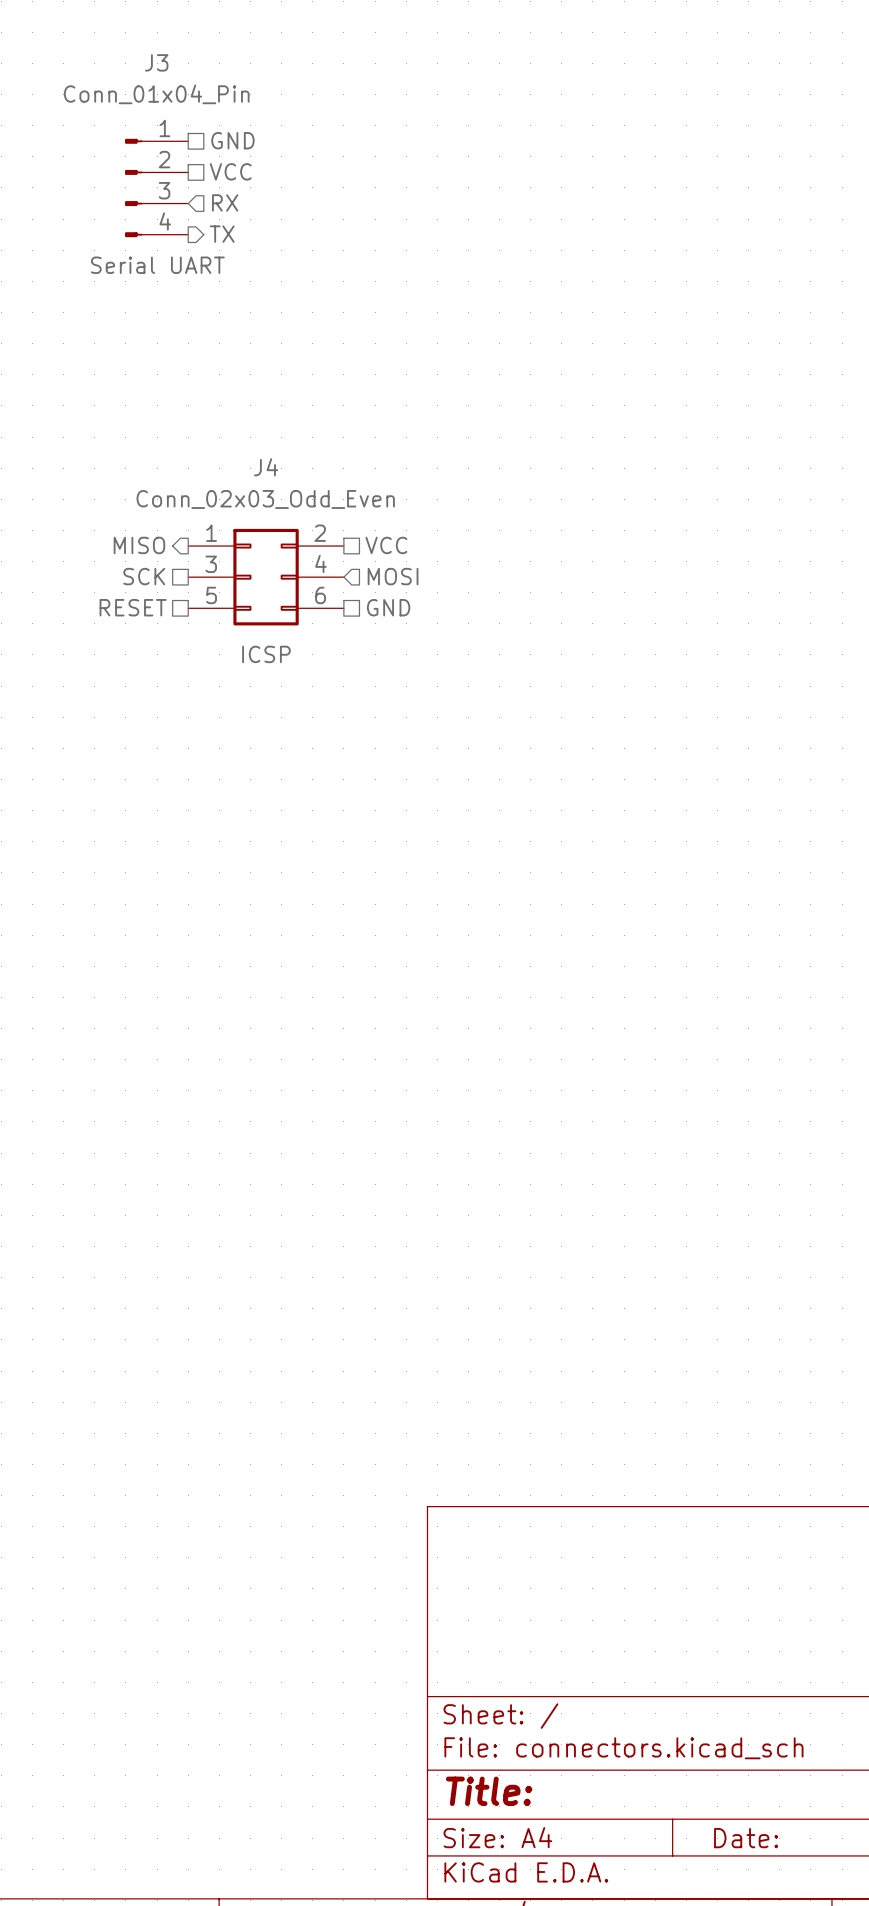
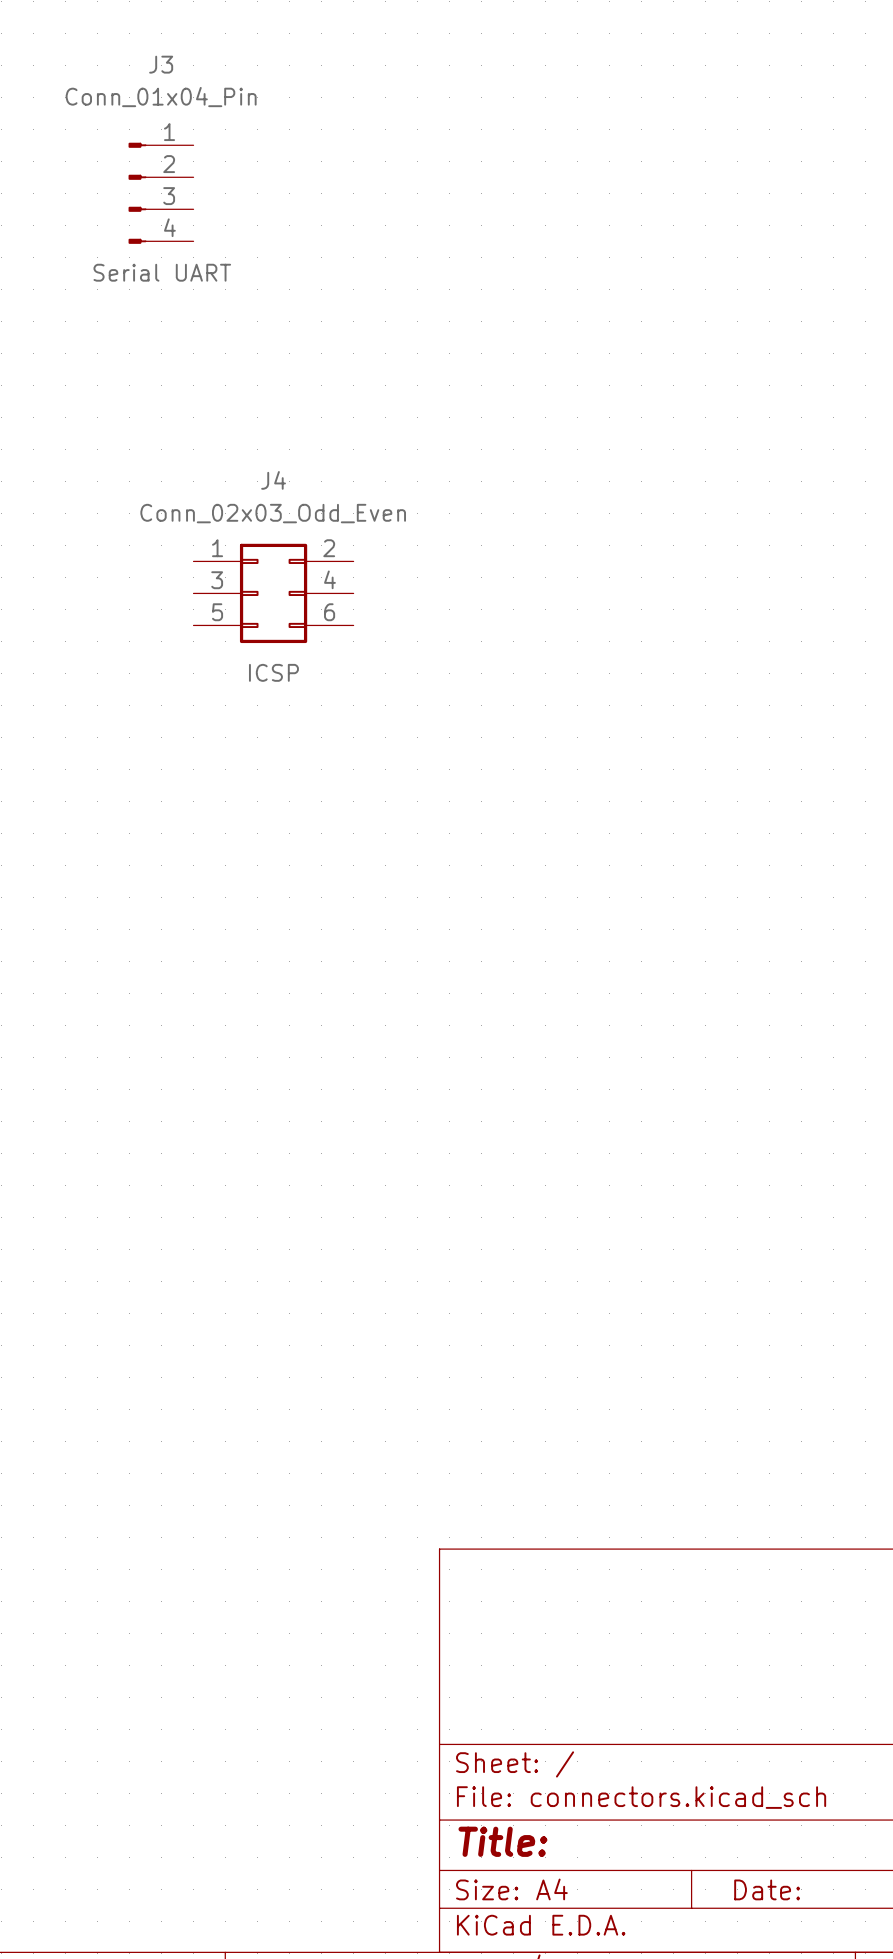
hierarchical label: GND (232, 140) -> none
hierarchical label: VCC (230, 171) -> none
hierarchical label: RX (225, 202) -> none
hierarchical label: TX (222, 234) -> none
hierarchical label: MISO (139, 545) -> none
hierarchical label: VCC (386, 545) -> none
hierarchical label: SCK (144, 576) -> none
hierarchical label: MOSI (393, 576) -> none
hierarchical label: RESET (133, 607) -> none
hierarchical label: GND (388, 607) -> none

